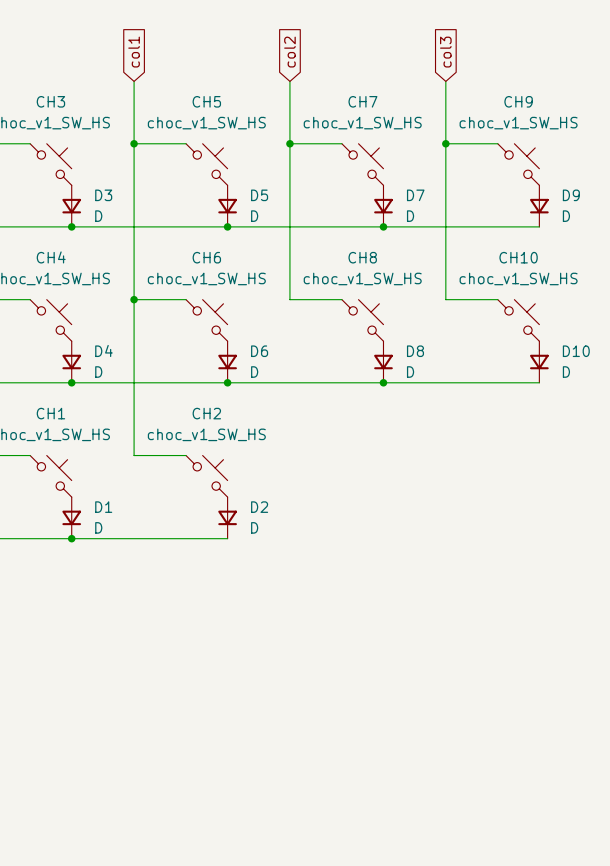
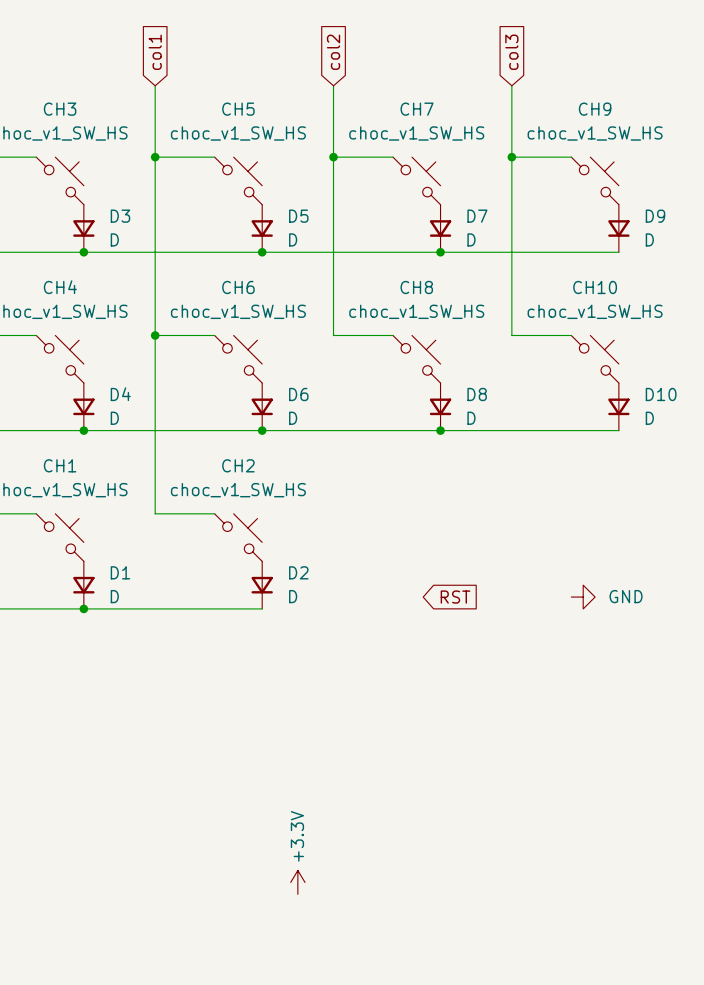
global label: none -> RST (455, 597)
power symbol: none -> GND (583, 597)
power symbol: none -> +3.3V (297, 882)

